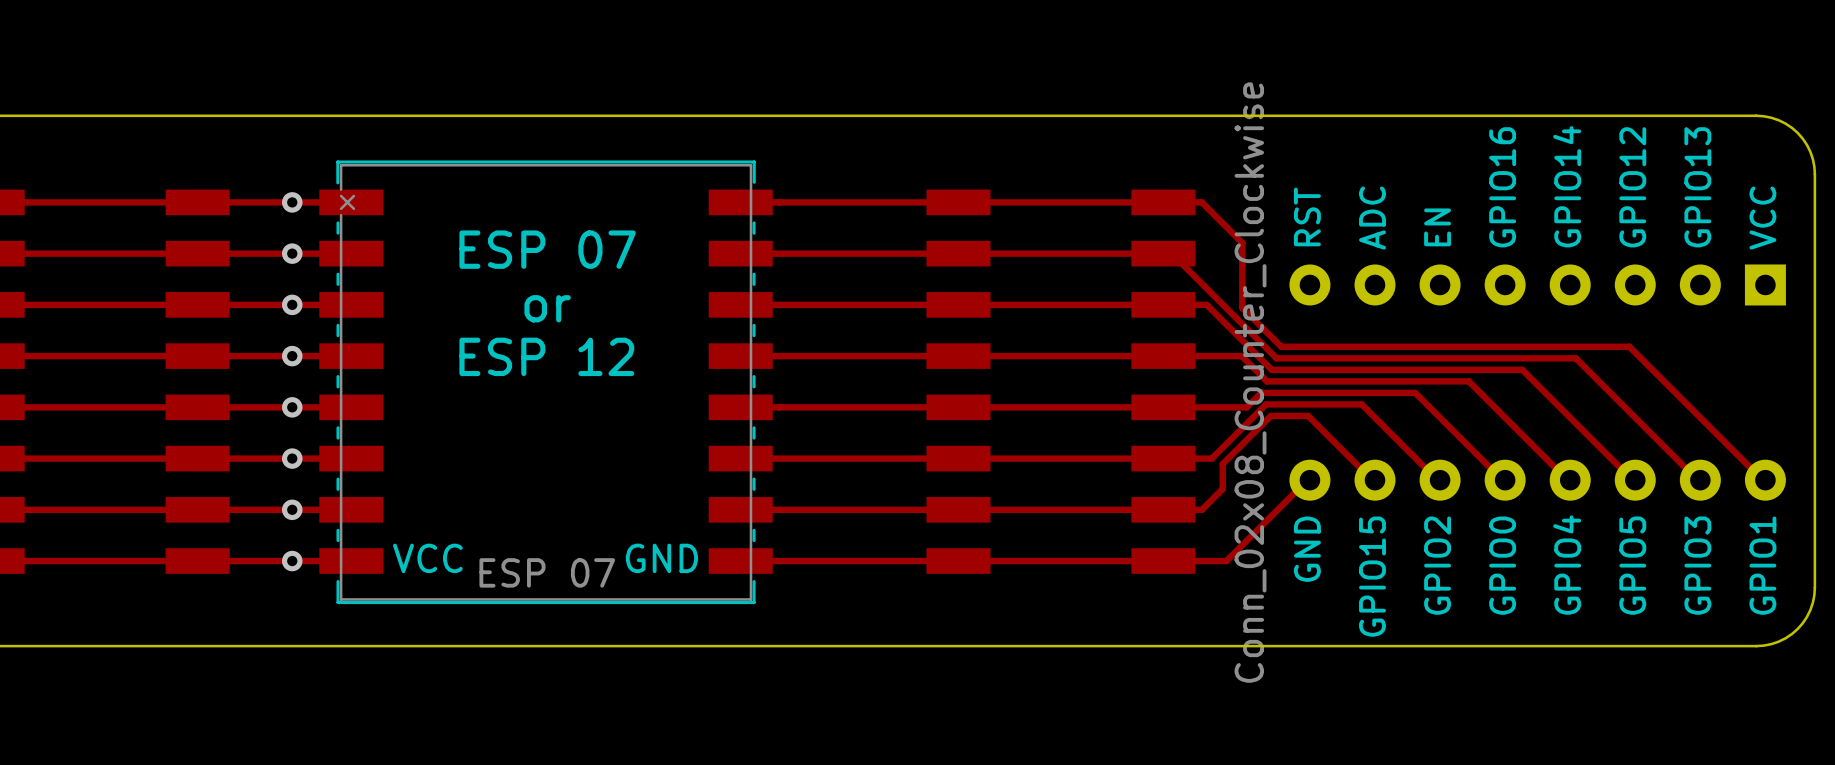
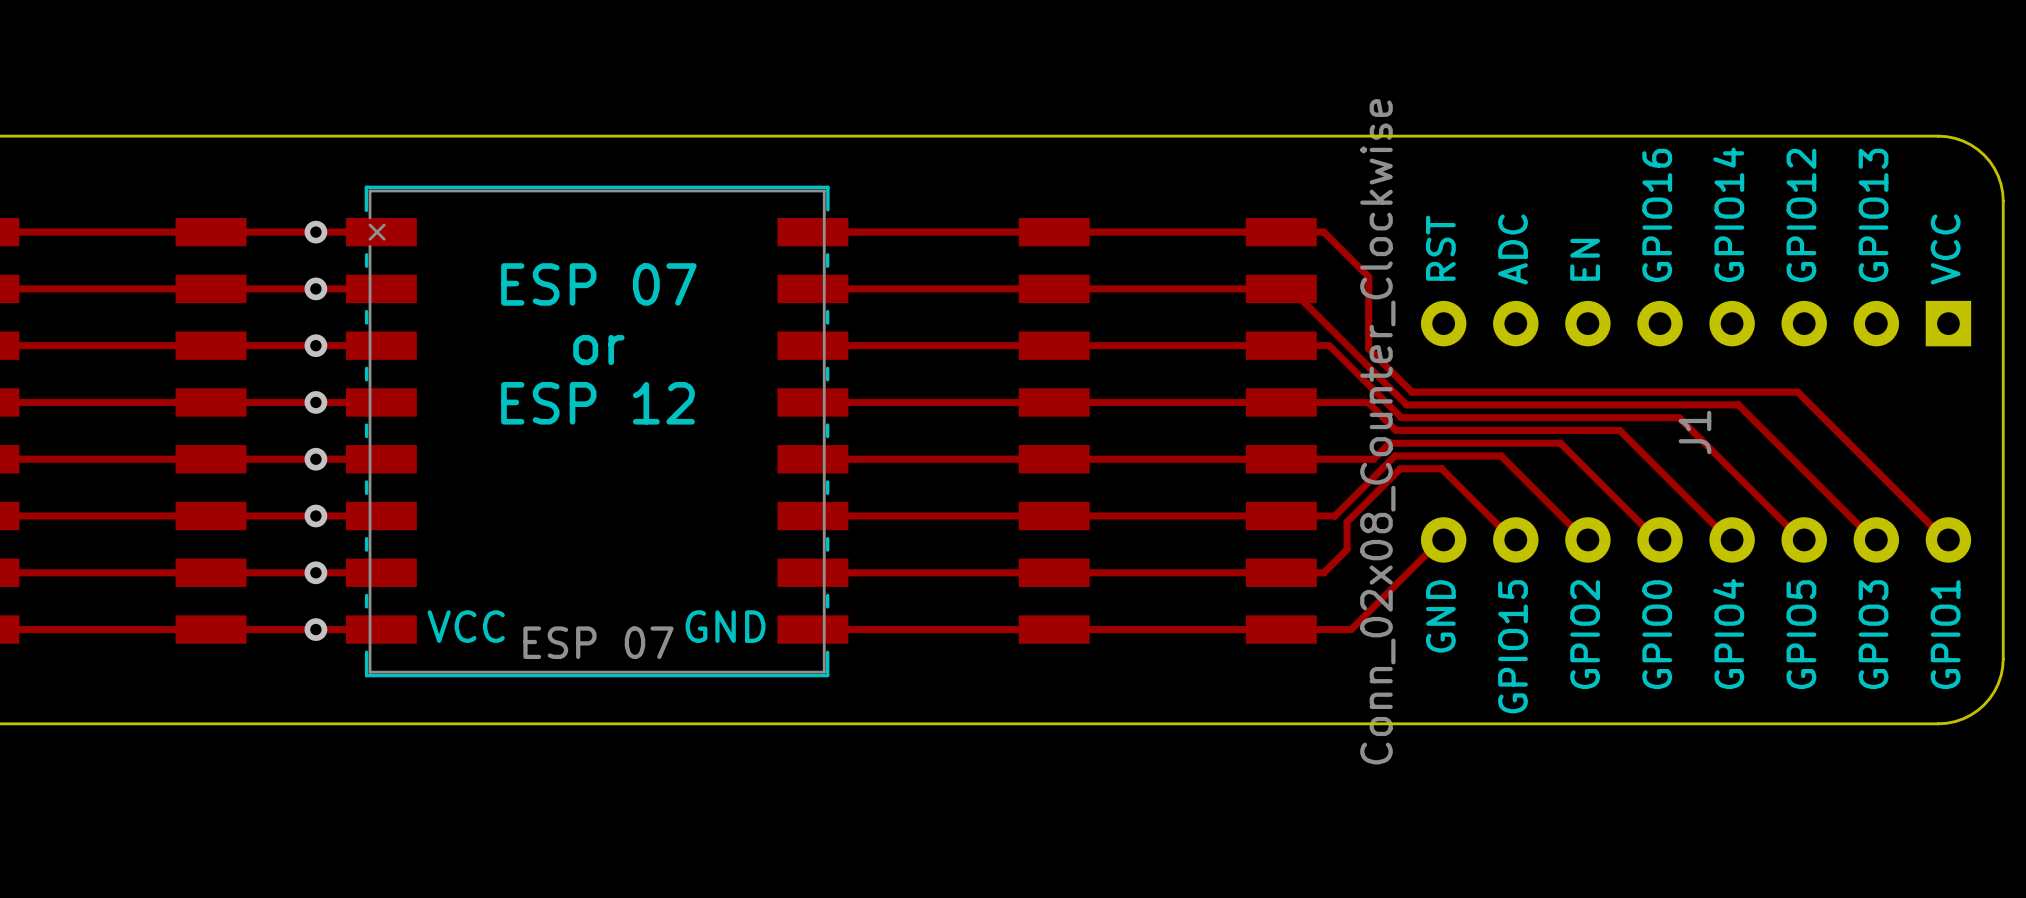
J1 name: none -> J1 (1695, 432)

